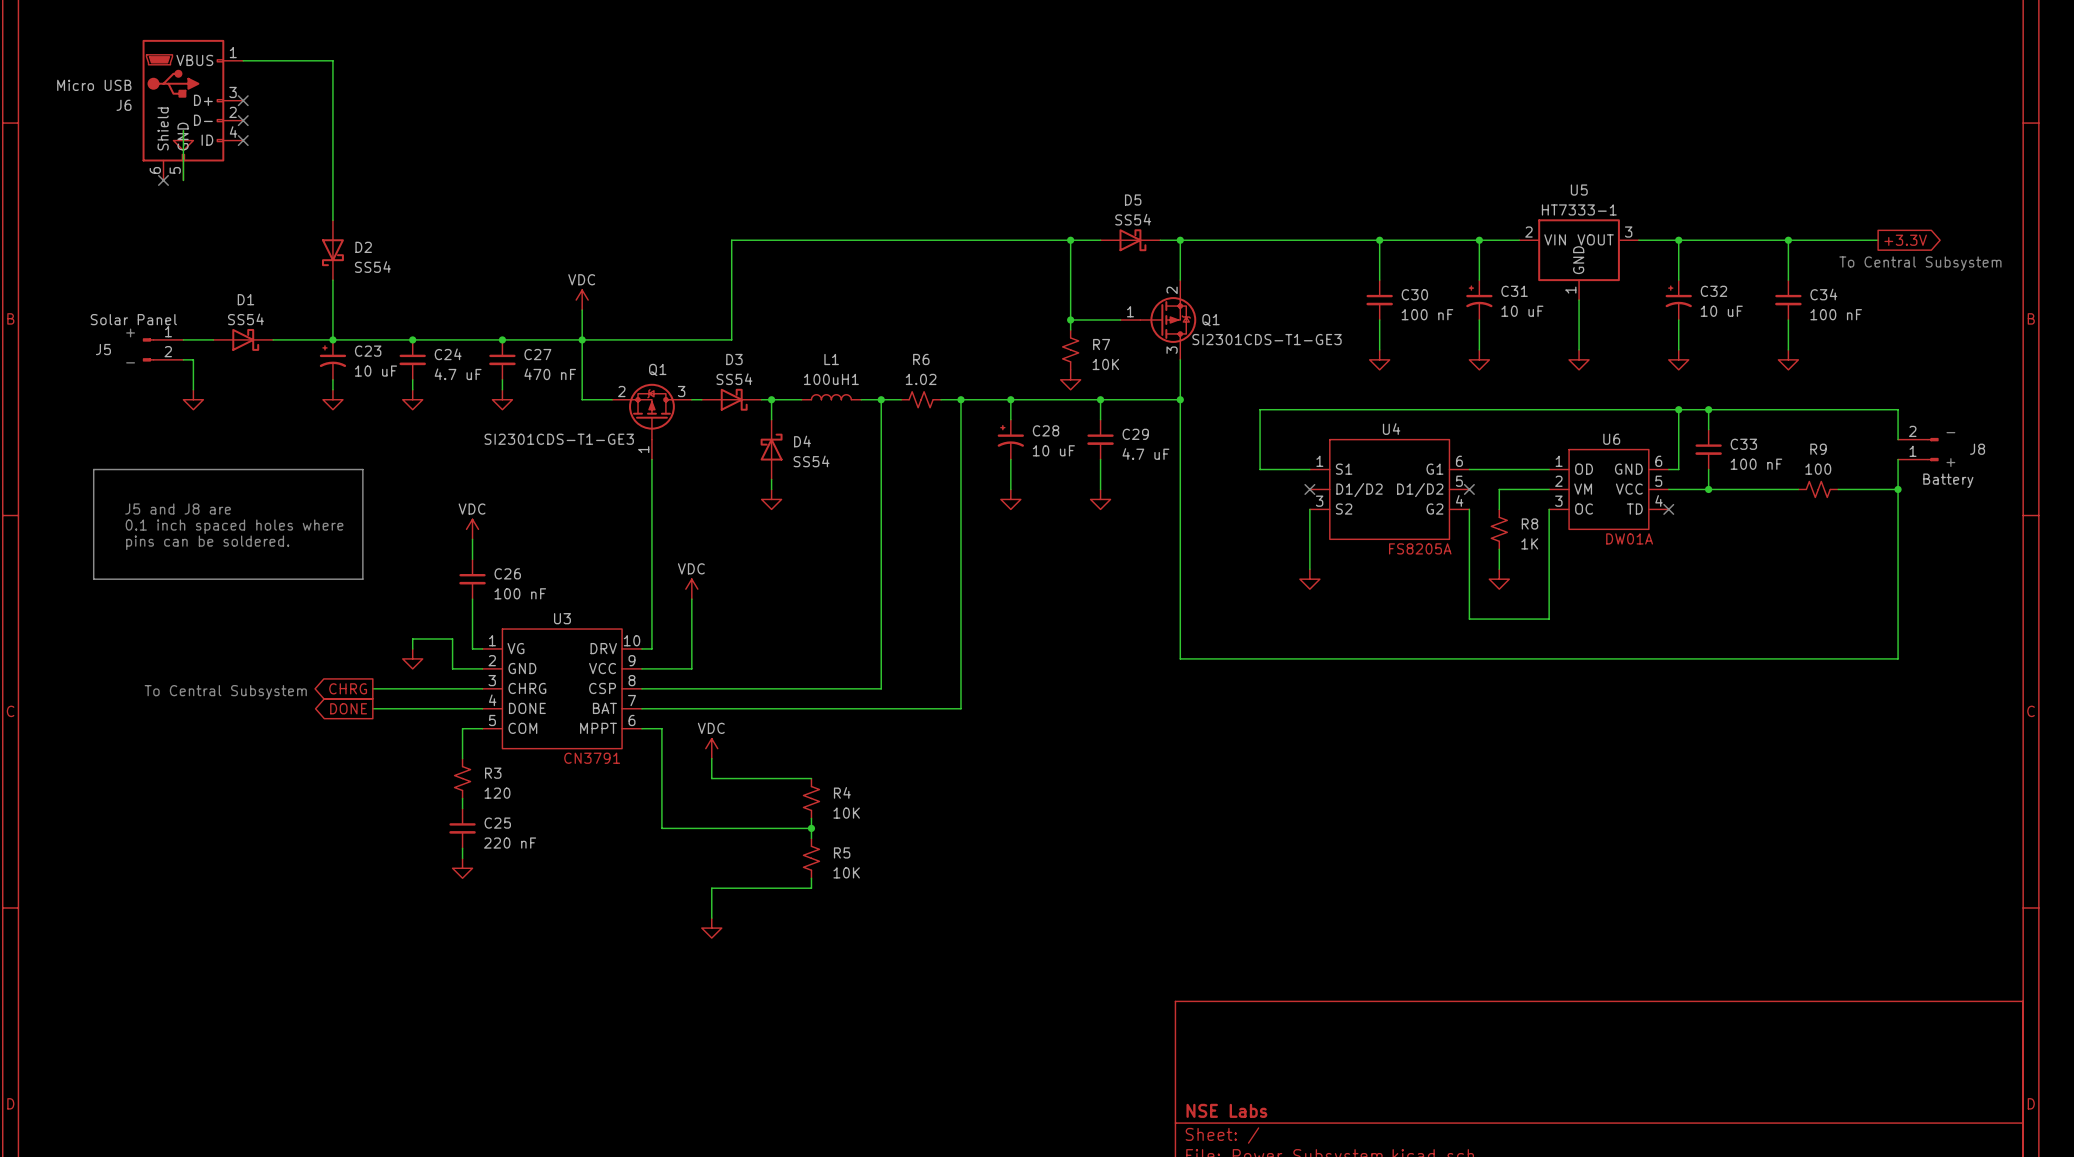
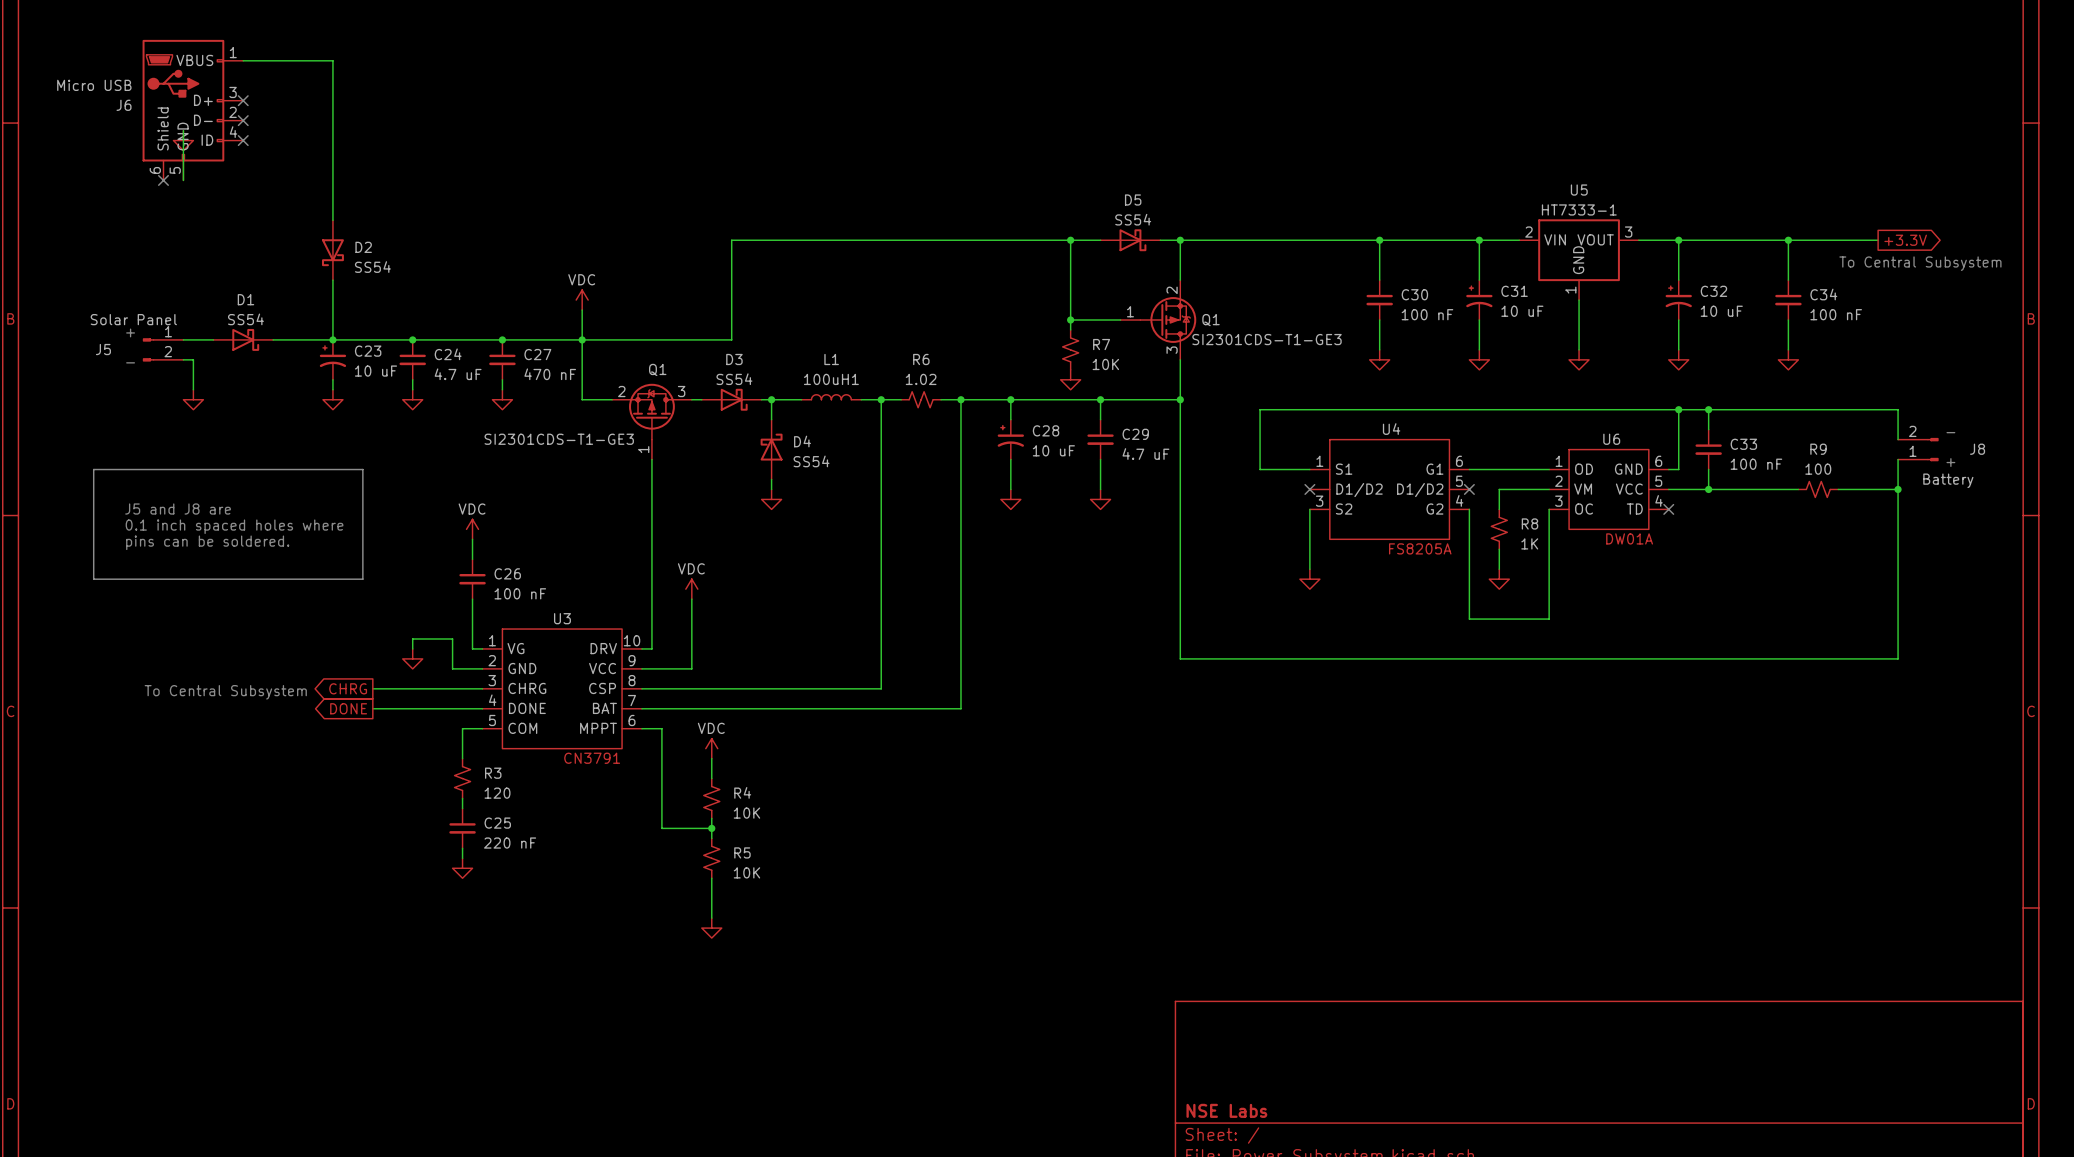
wire: (711, 778) (811, 778) -> none
R4 position: (811, 798) -> (711, 798)
wire: (811, 818) (811, 838) -> (711, 818) (711, 838)
wire: (711, 828) (811, 828) -> none
junction: none -> (711, 828)
junction: (811, 828) -> none
R5 position: (811, 858) -> (711, 858)
wire: (811, 878) (811, 888) (711, 888) -> (711, 878) (711, 888)

